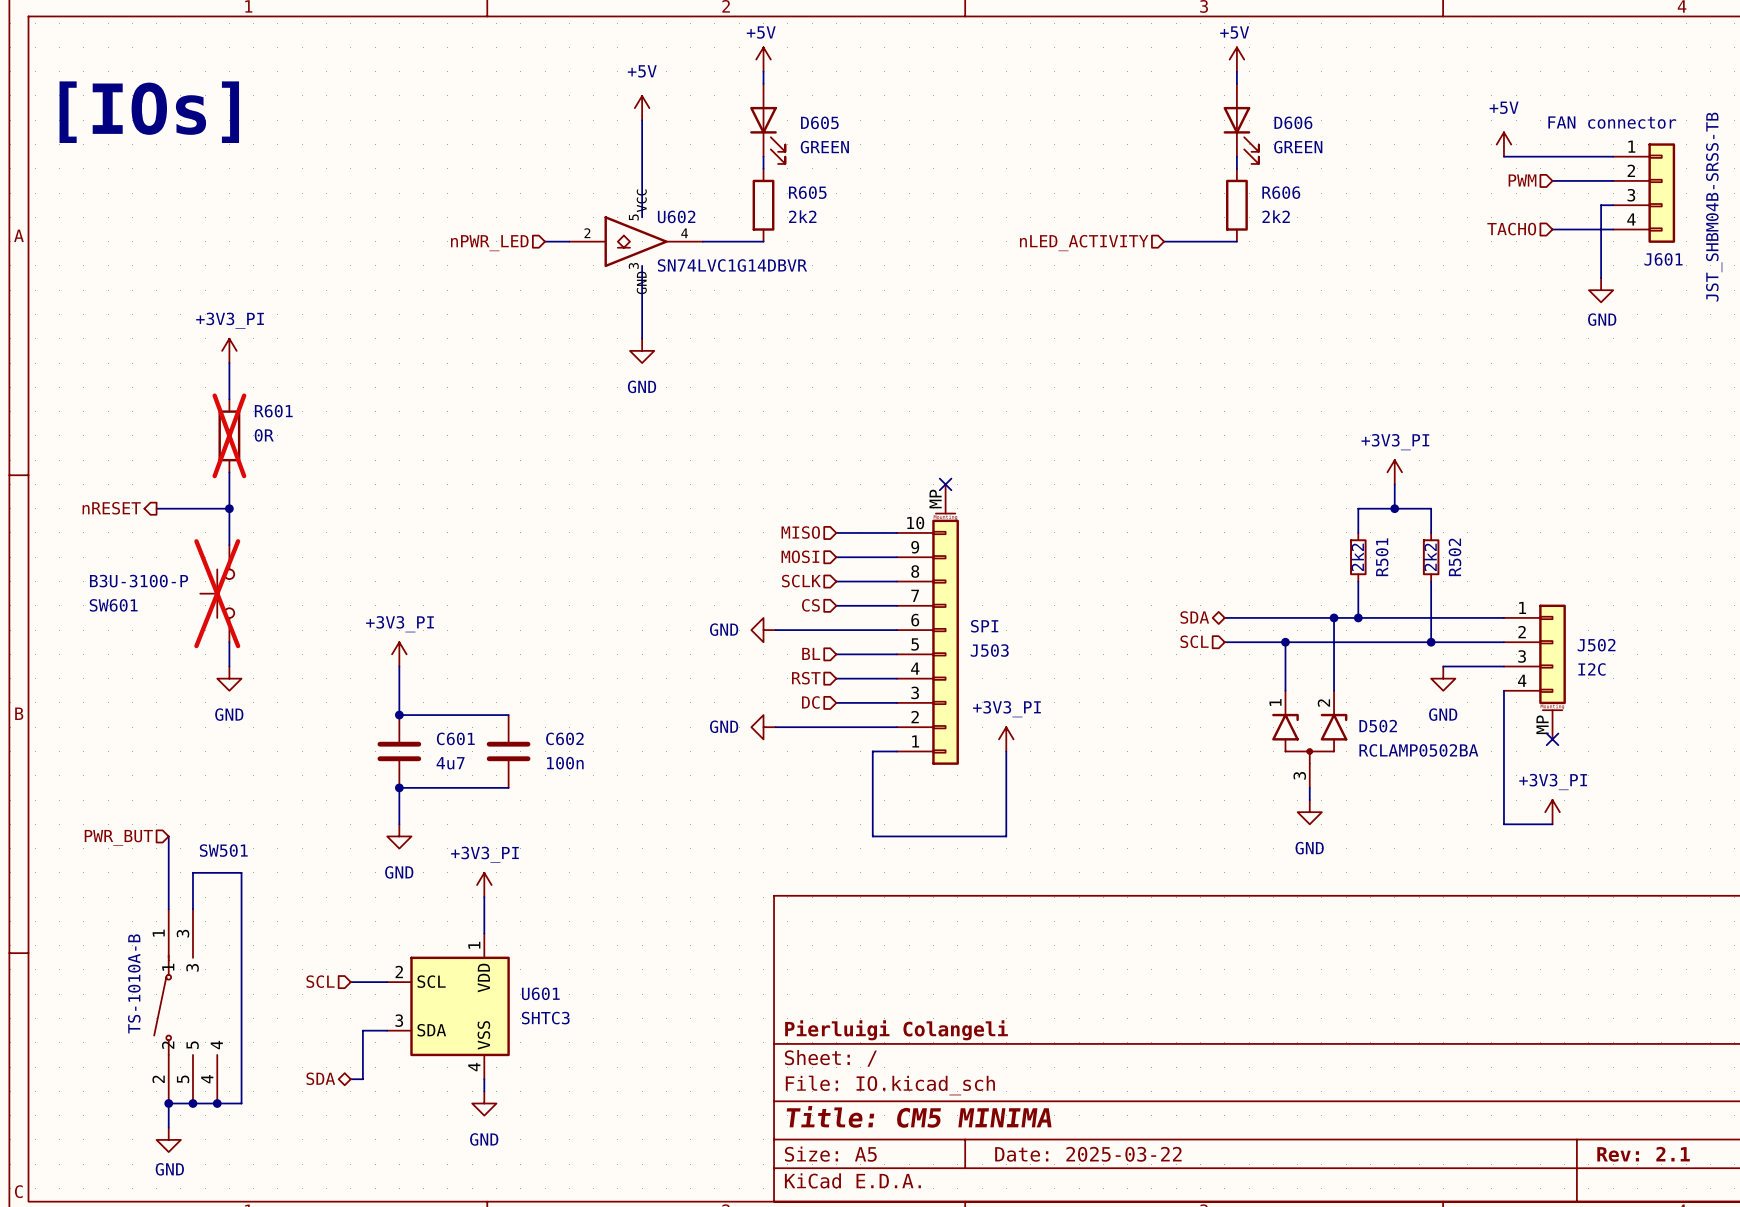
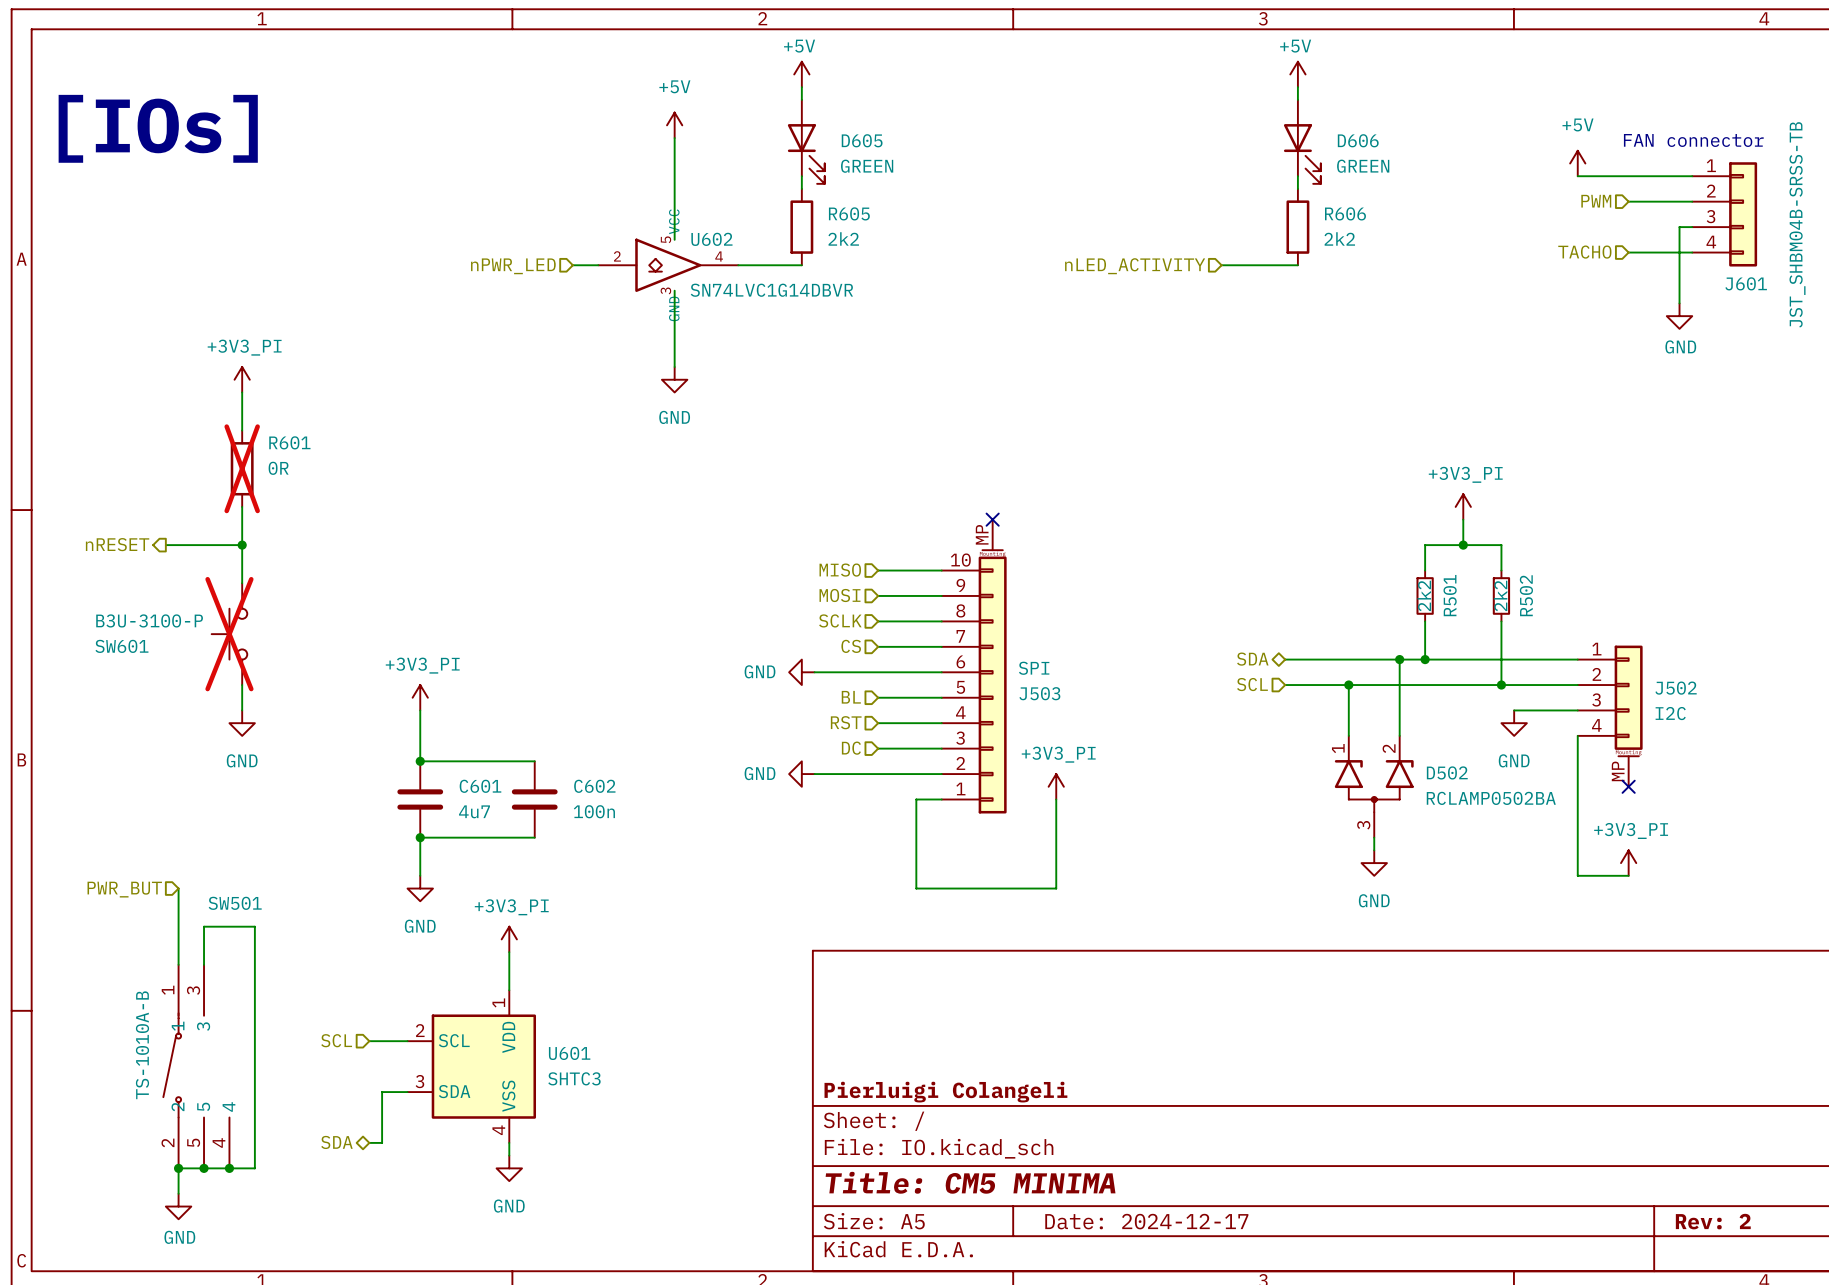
title block: Date: 2025-03-22 (1088, 1154) -> Date: 2024-12-17 (1146, 1221)
title block: Rev: 2.1 (1643, 1154) -> Rev: 2 (1713, 1221)

